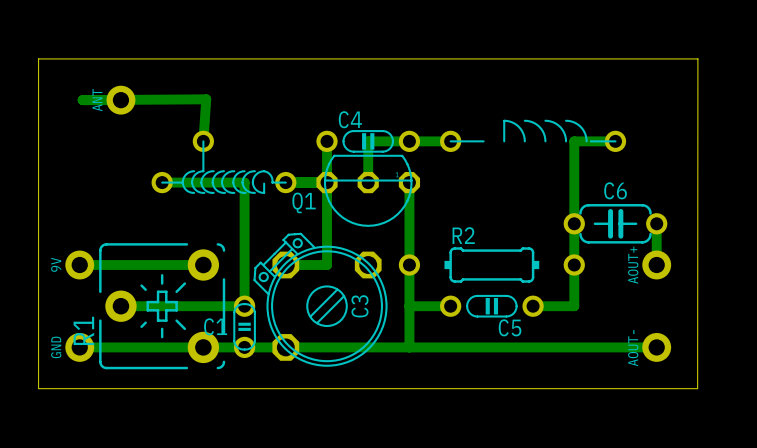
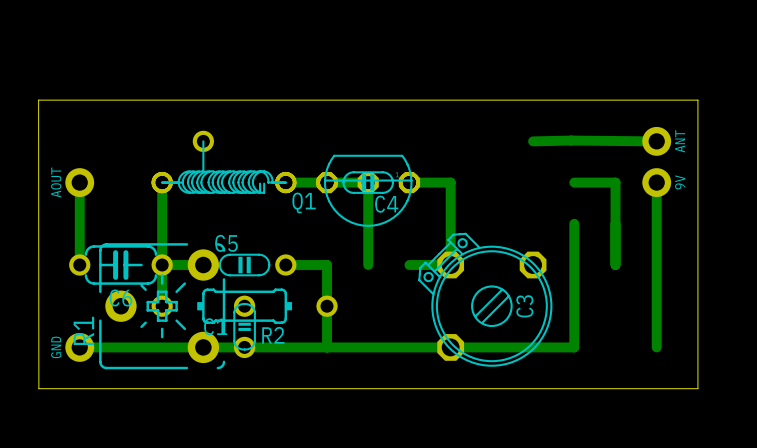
bottom track: (120, 100) (82, 100) (206, 99) (203, 141) -> none
ANT: (120, 100) -> none
C4 name position: C4 (350, 119) -> C4 (386, 204)
part: (533, 135) -> none
bottom track: (327, 141) (327, 265) -> (327, 347) (327, 265)
C4 position: (368, 141) -> (368, 182)
bottom track: (450, 141) (368, 141) (368, 182) -> none
bottom track: none -> (533, 141) (656, 141)
bottom track: (615, 141) (574, 141) (574, 223) -> none
ANT: none -> (656, 141)
AOUT: none -> (79, 182)
bottom track: (162, 182) (244, 182) (244, 306) (120, 306) -> (162, 182) (162, 306)
part: none -> (223, 182)
bottom track: none -> (327, 182) (368, 182) (368, 265)
bottom track: (409, 182) (409, 347) -> (409, 182) (450, 182) (450, 265) (409, 265)
bottom track: none -> (574, 182) (615, 182) (615, 265)
bottom track: none -> (656, 182) (656, 223)
C6 rotation: 0° (615, 223) -> 180° (120, 265)
C6 position: (615, 223) -> (120, 265)
R2 name position: R2 (463, 235) -> R2 (273, 335)
9V name position: 9V (56, 264) -> 9V (680, 182)
bottom track: (79, 265) (162, 265) -> (79, 265) (79, 182)
9V position: (79, 265) -> (656, 182)
R2 position: (491, 265) -> (244, 306)
AOUT+: (656, 265) -> none
C3 position: (320, 299) -> (485, 299)
bottom track: (409, 306) (450, 306) -> none
C5 position: (491, 306) -> (244, 265)
bottom track: (533, 306) (574, 306) -> (574, 347) (574, 306)
C5 name position: C5 (510, 327) -> C5 (226, 243)
bottom track: (574, 347) (656, 347) -> (656, 265) (656, 347)
AOUT-: (656, 347) -> none
board edge: (38, 388) (38, 58) (697, 58) (697, 388) -> (38, 388) (38, 100) (697, 100) (697, 388)

